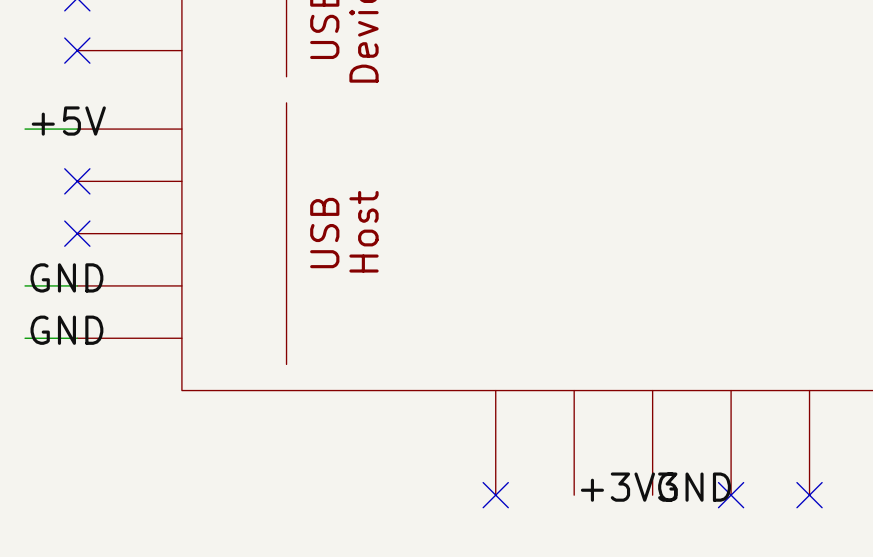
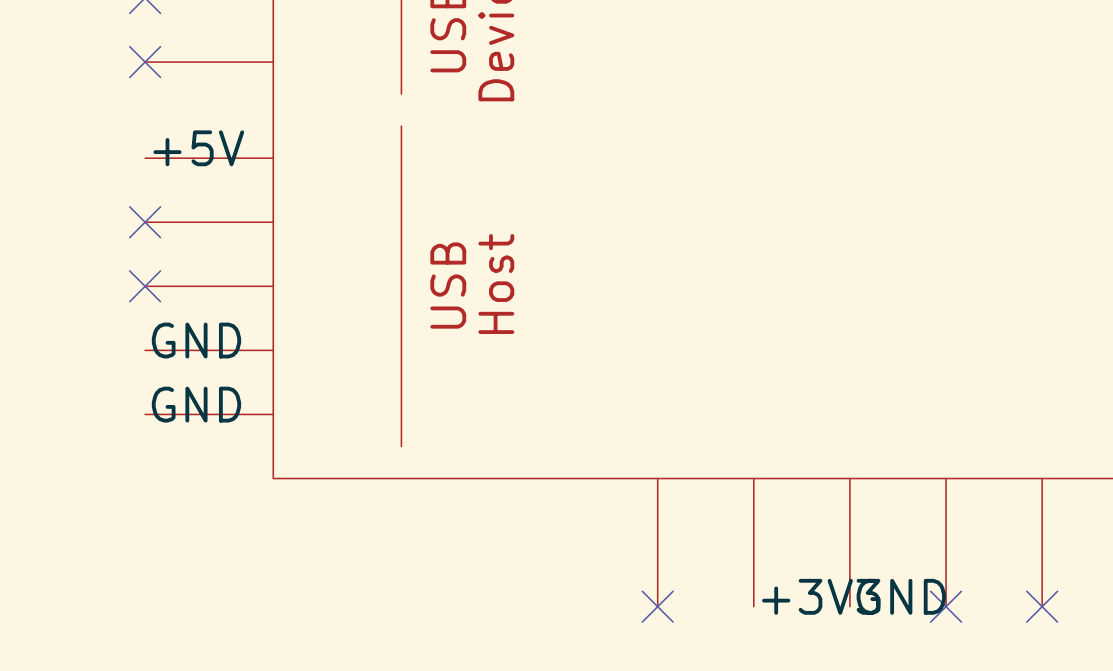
label position: +5V (68, 121) -> +5V (198, 148)
wire: (25, 129) (77, 129) -> none
label: GND (66, 277) -> none
label: none -> GND (196, 340)
wire: (25, 285) (77, 285) -> none
label: GND (66, 330) -> none
label: none -> GND (196, 404)
wire: (25, 338) (77, 338) -> none

